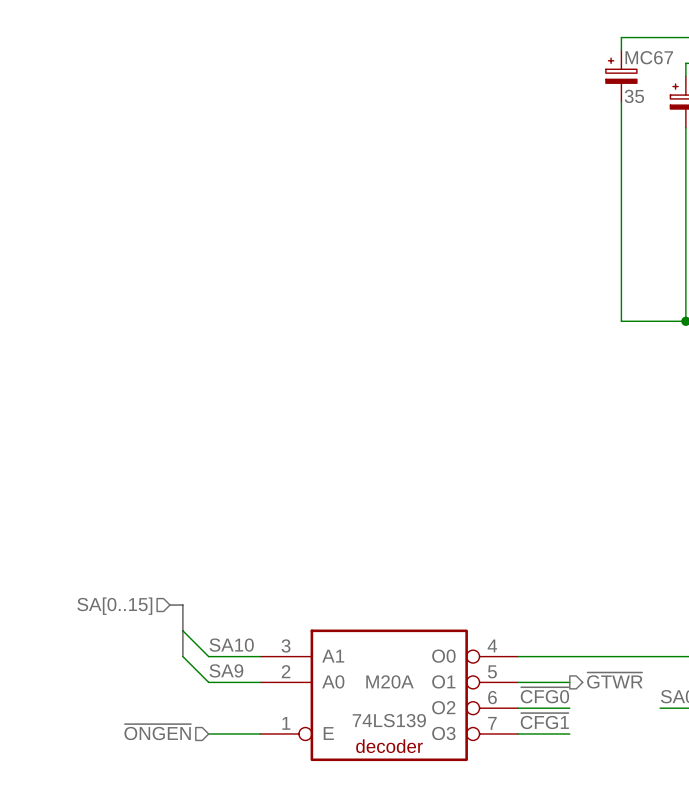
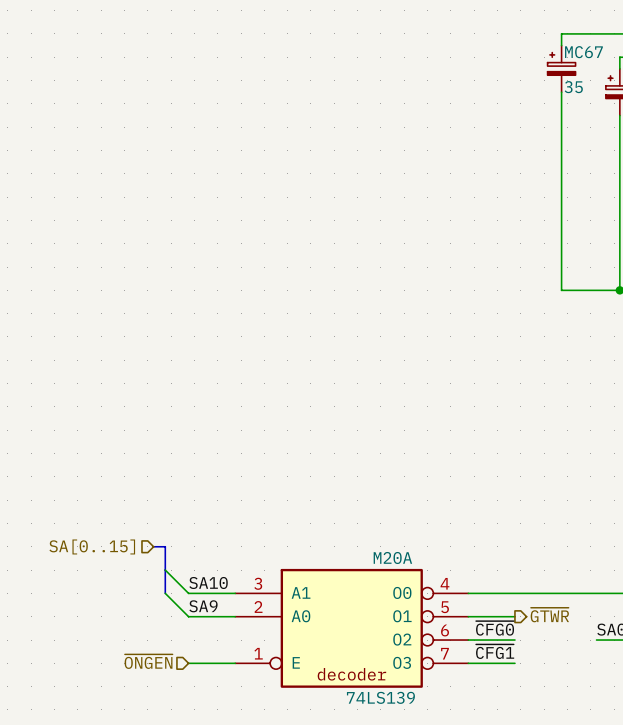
M20A name position: M20A (390, 681) -> M20A (392, 557)
M20A value position: 74LS139 (389, 720) -> 74LS139 (380, 697)

